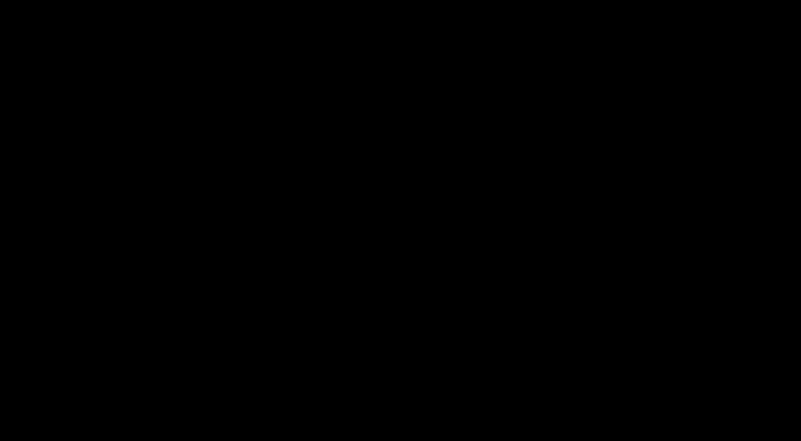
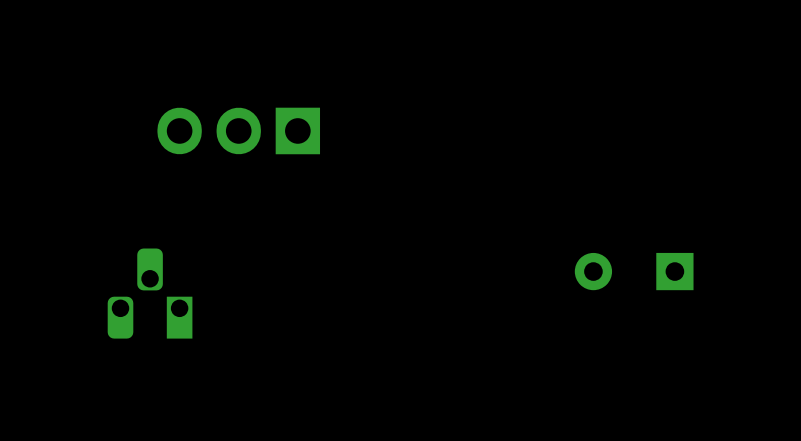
part: none -> (238, 130)
part: none -> (634, 271)
part: none -> (150, 293)

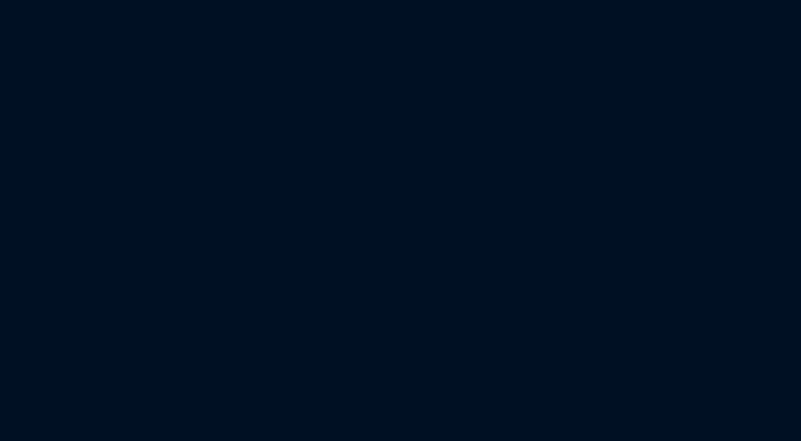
part: (238, 130) -> none
part: (634, 271) -> none
part: (150, 293) -> none

